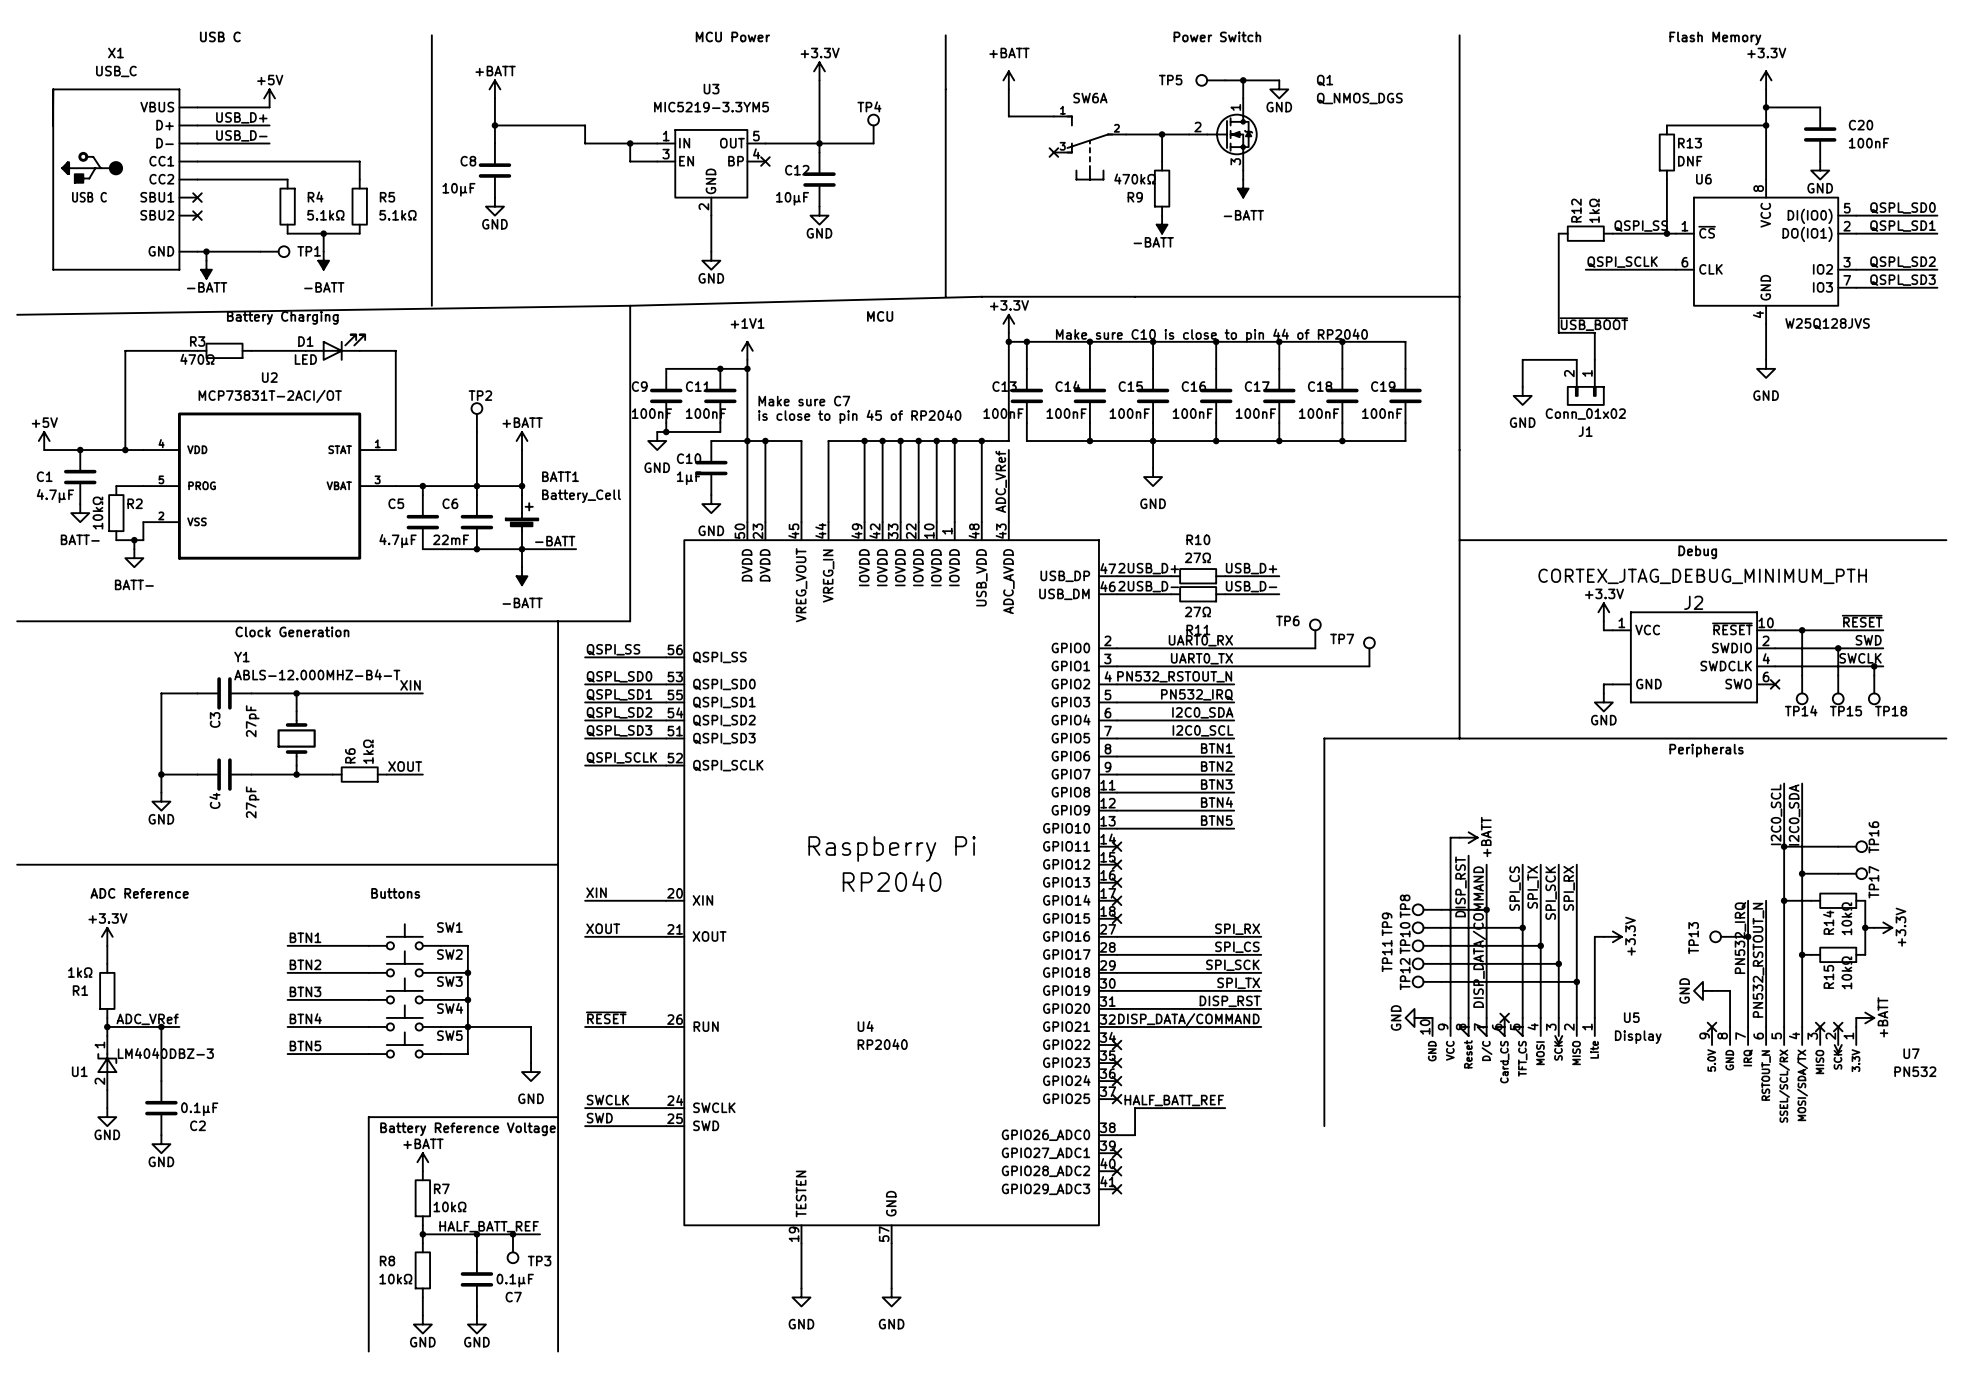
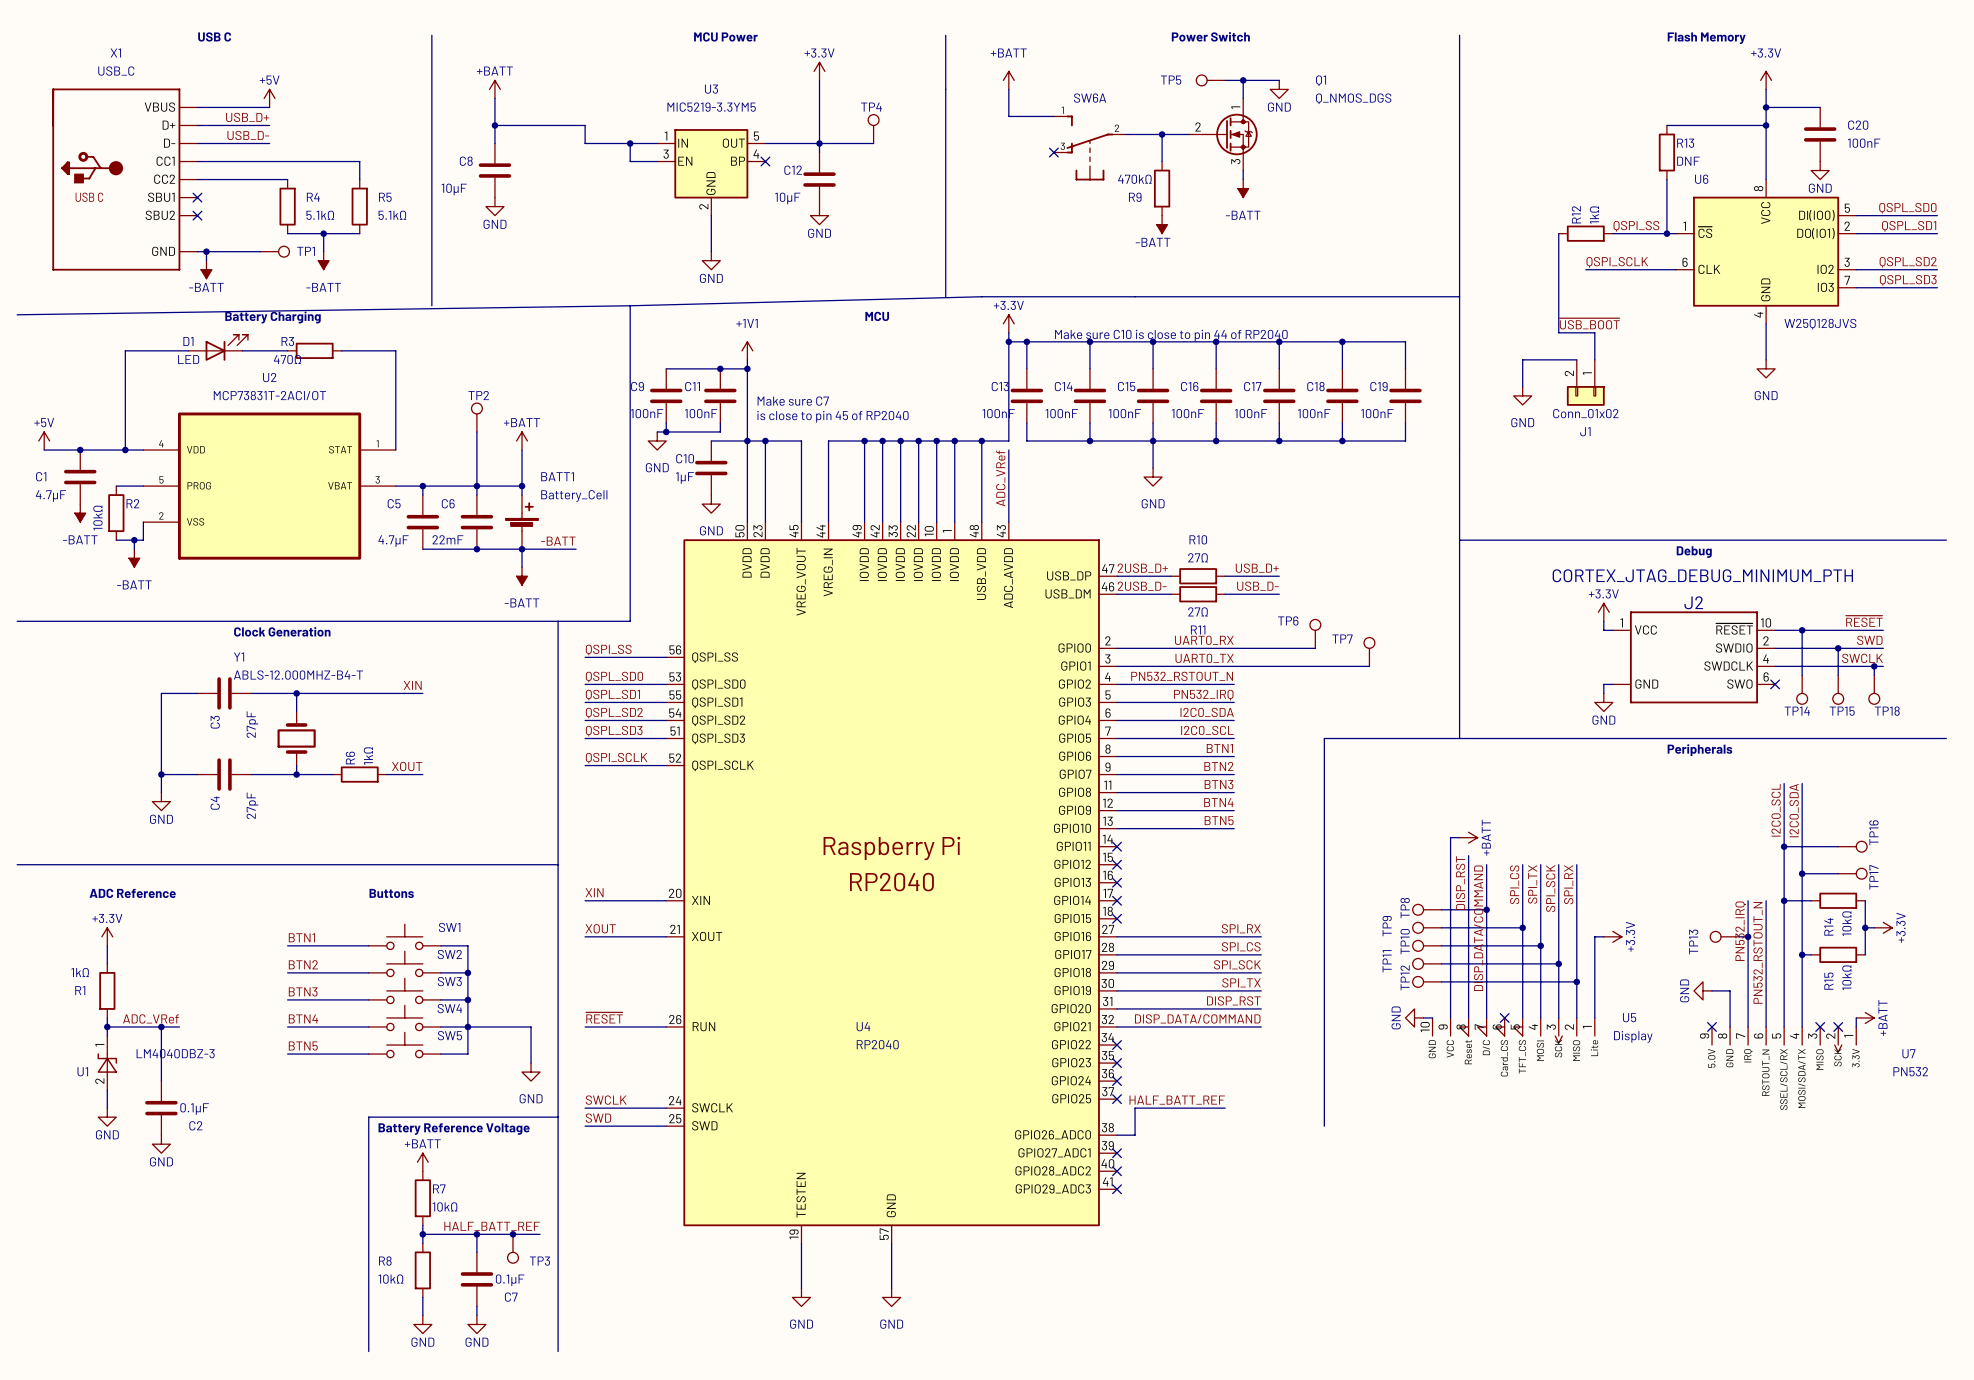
D1 position: (335, 347) -> (218, 347)
R3 position: (224, 350) -> (314, 350)
power symbol: BATT- (80, 513) -> -BATT (80, 513)
power symbol: BATT- (134, 558) -> -BATT (134, 558)

